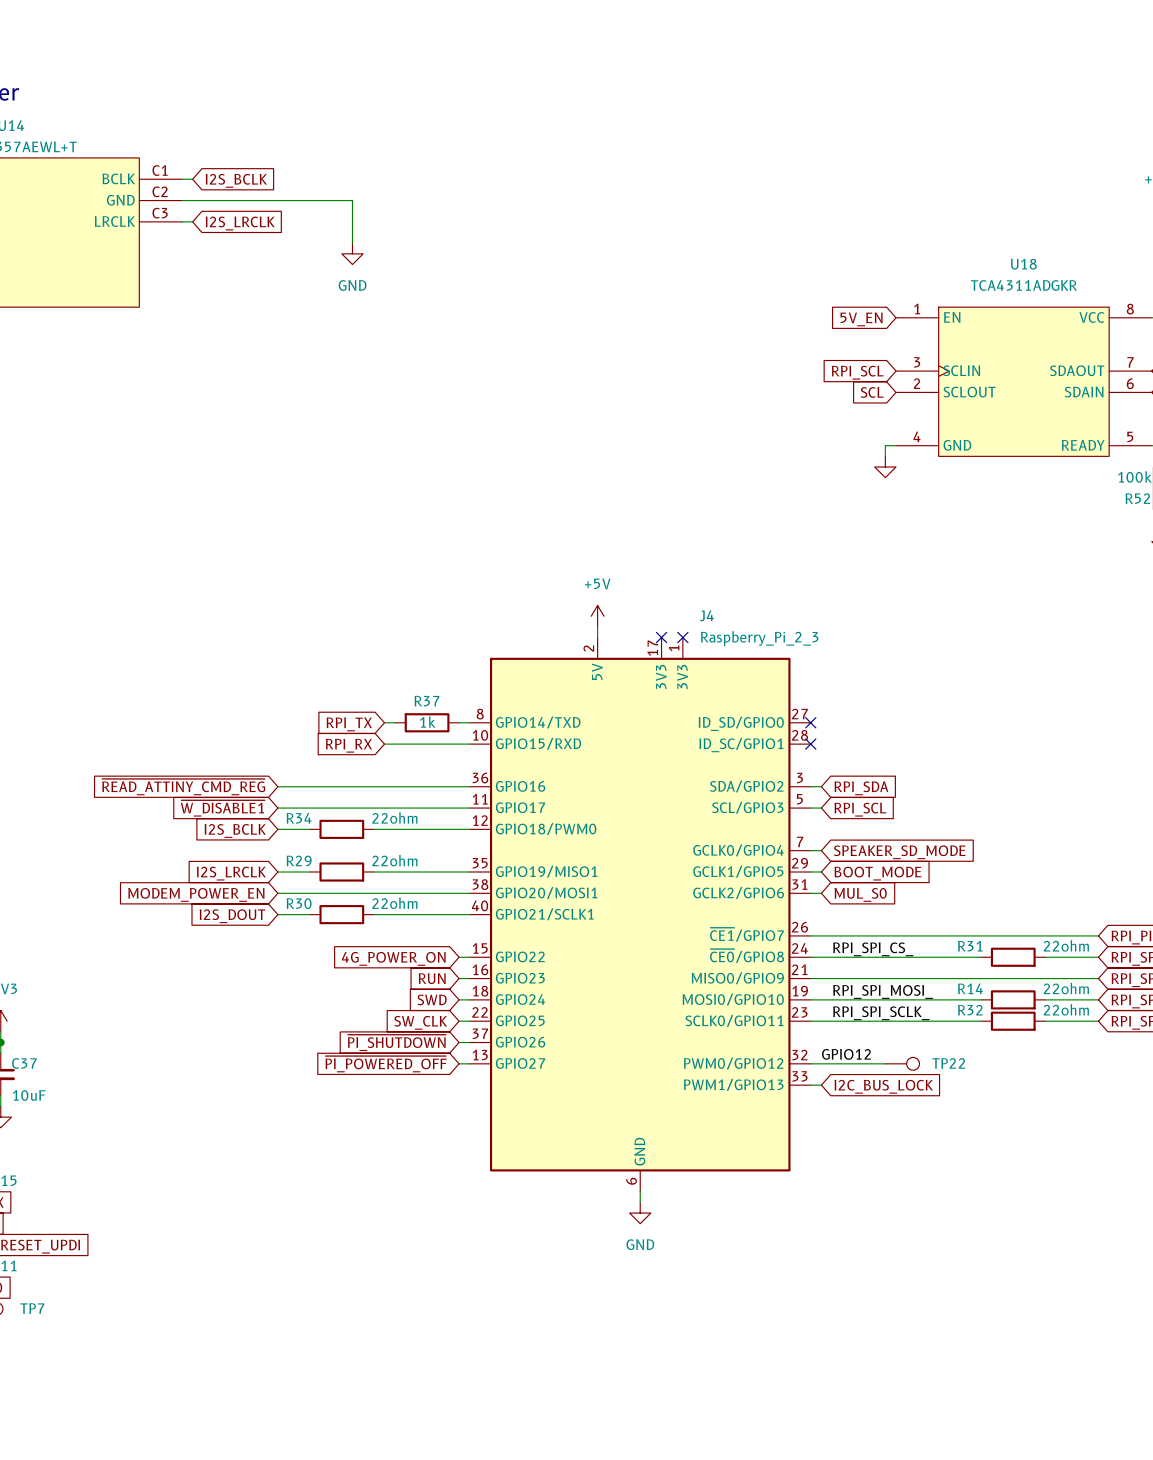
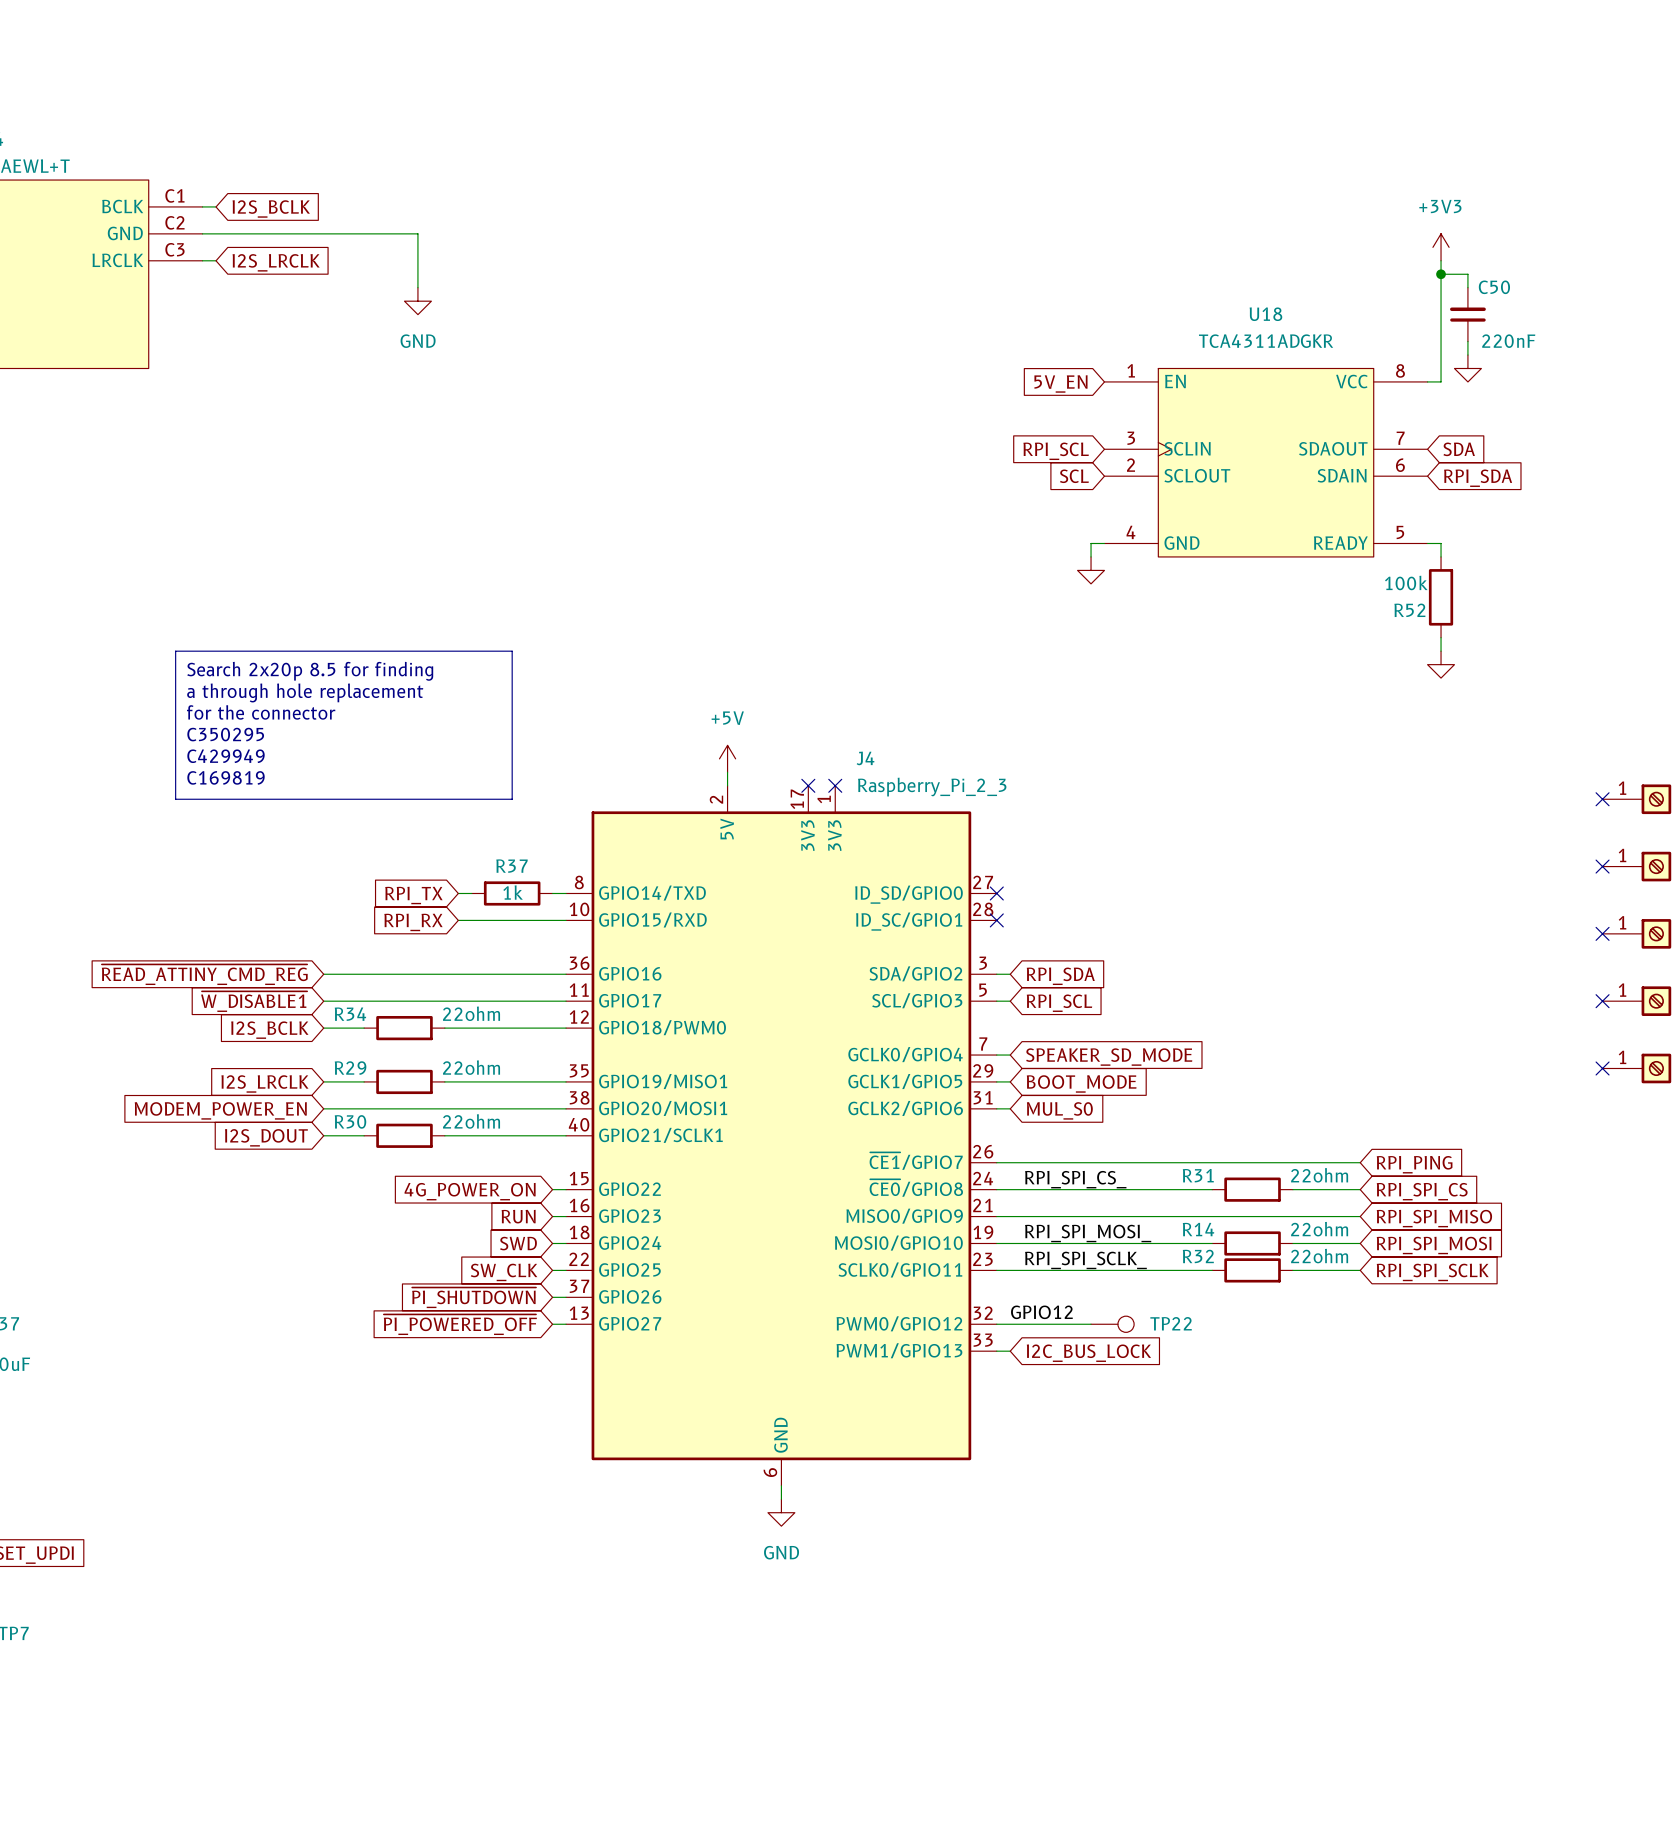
line: none -> (175, 651) (512, 651) (512, 799) (175, 799) (175, 651)
text: none -> Search 2x20p 8.5 for finding (310, 671)
text: none -> a through hole replacement (305, 692)
text: none -> for the connector (261, 712)
text: none -> C350295 (225, 734)
text: none -> C429949 (226, 756)
text: none -> C169819 (226, 777)

